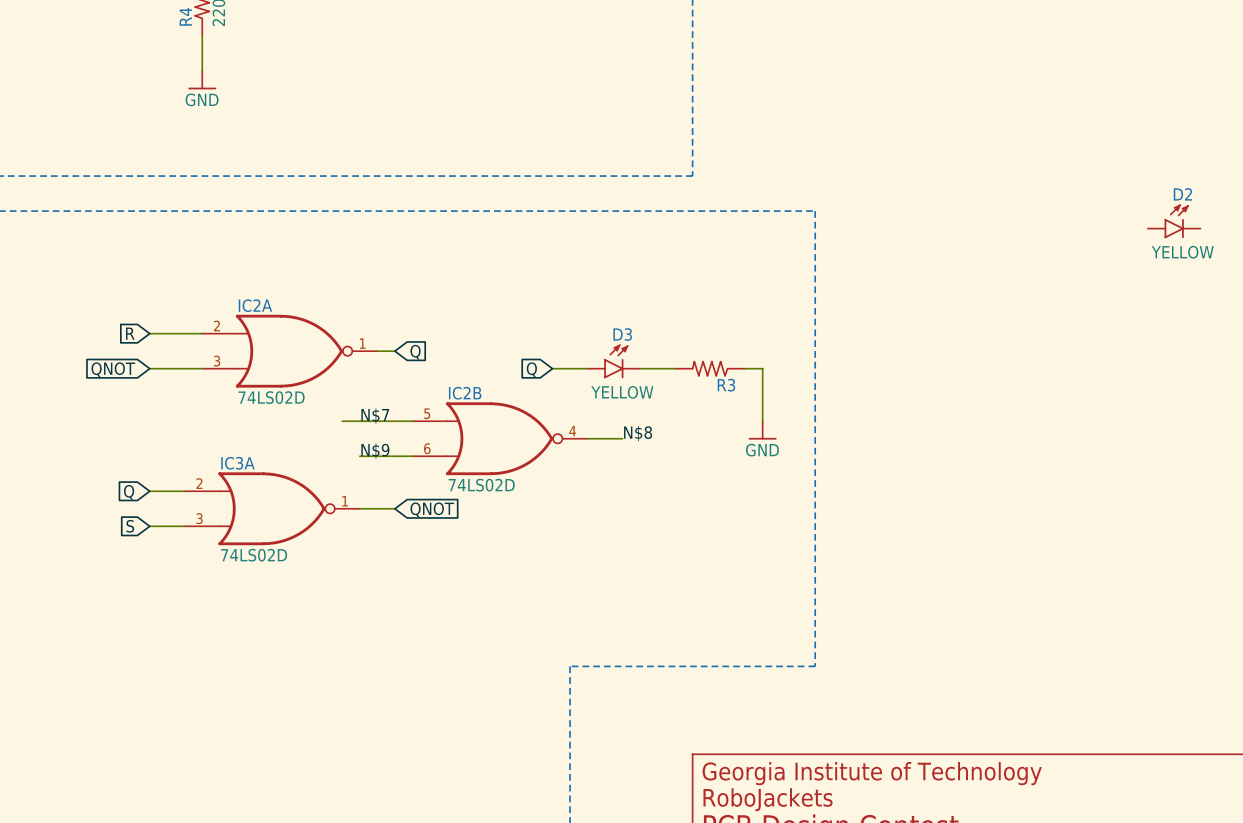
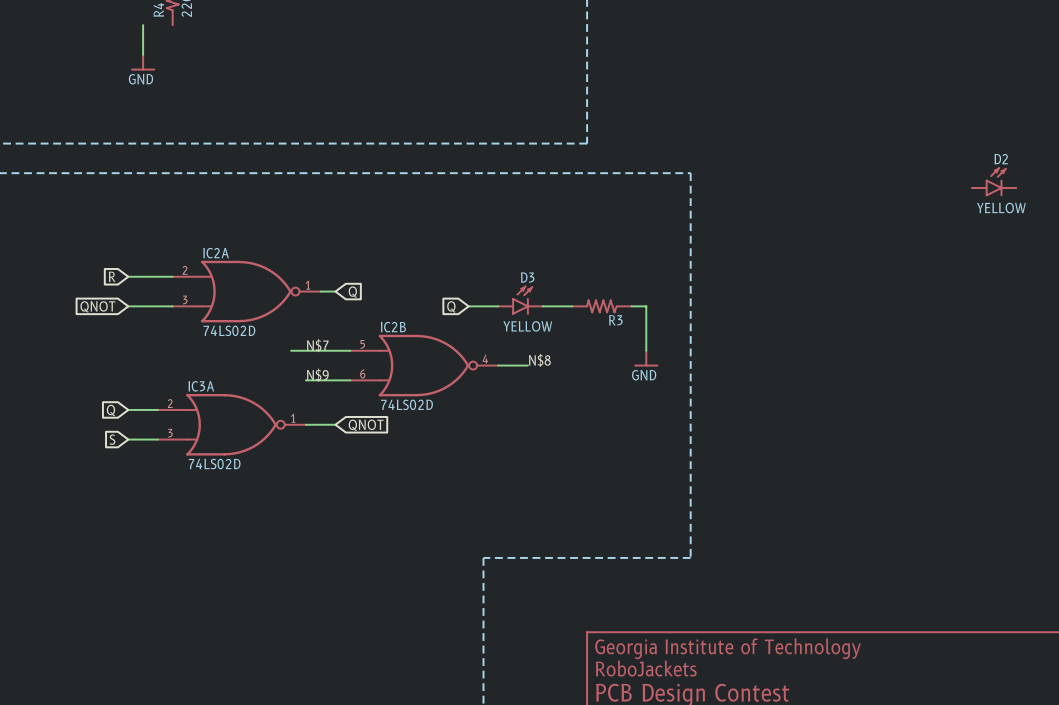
wire: (202, 35) (202, 70) -> (143, 25) (143, 54)
power symbol position: GND (202, 80) -> GND (143, 62)

